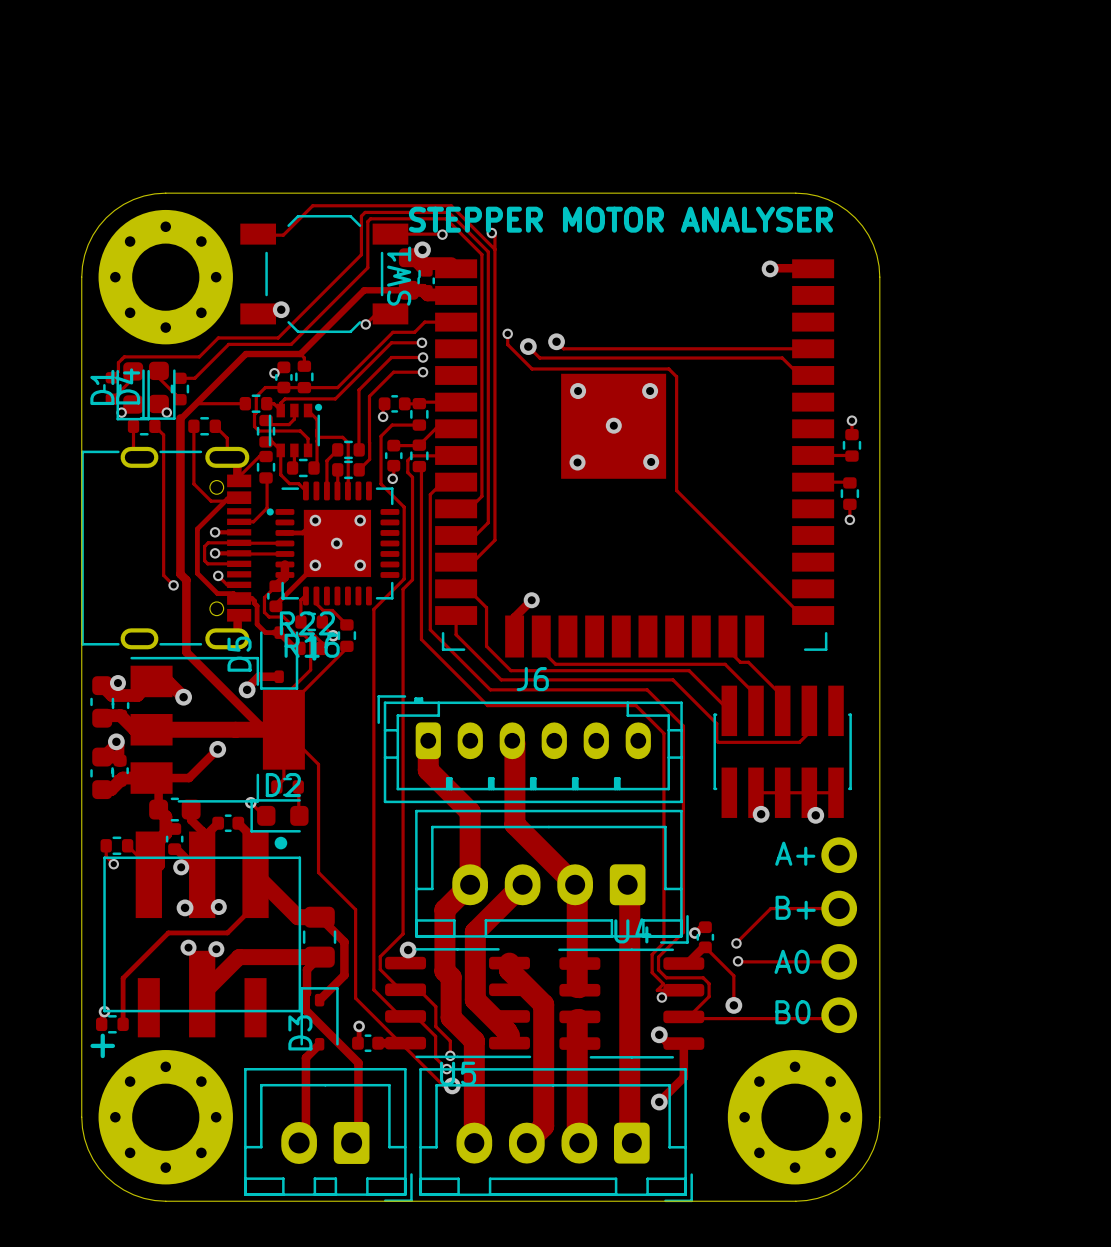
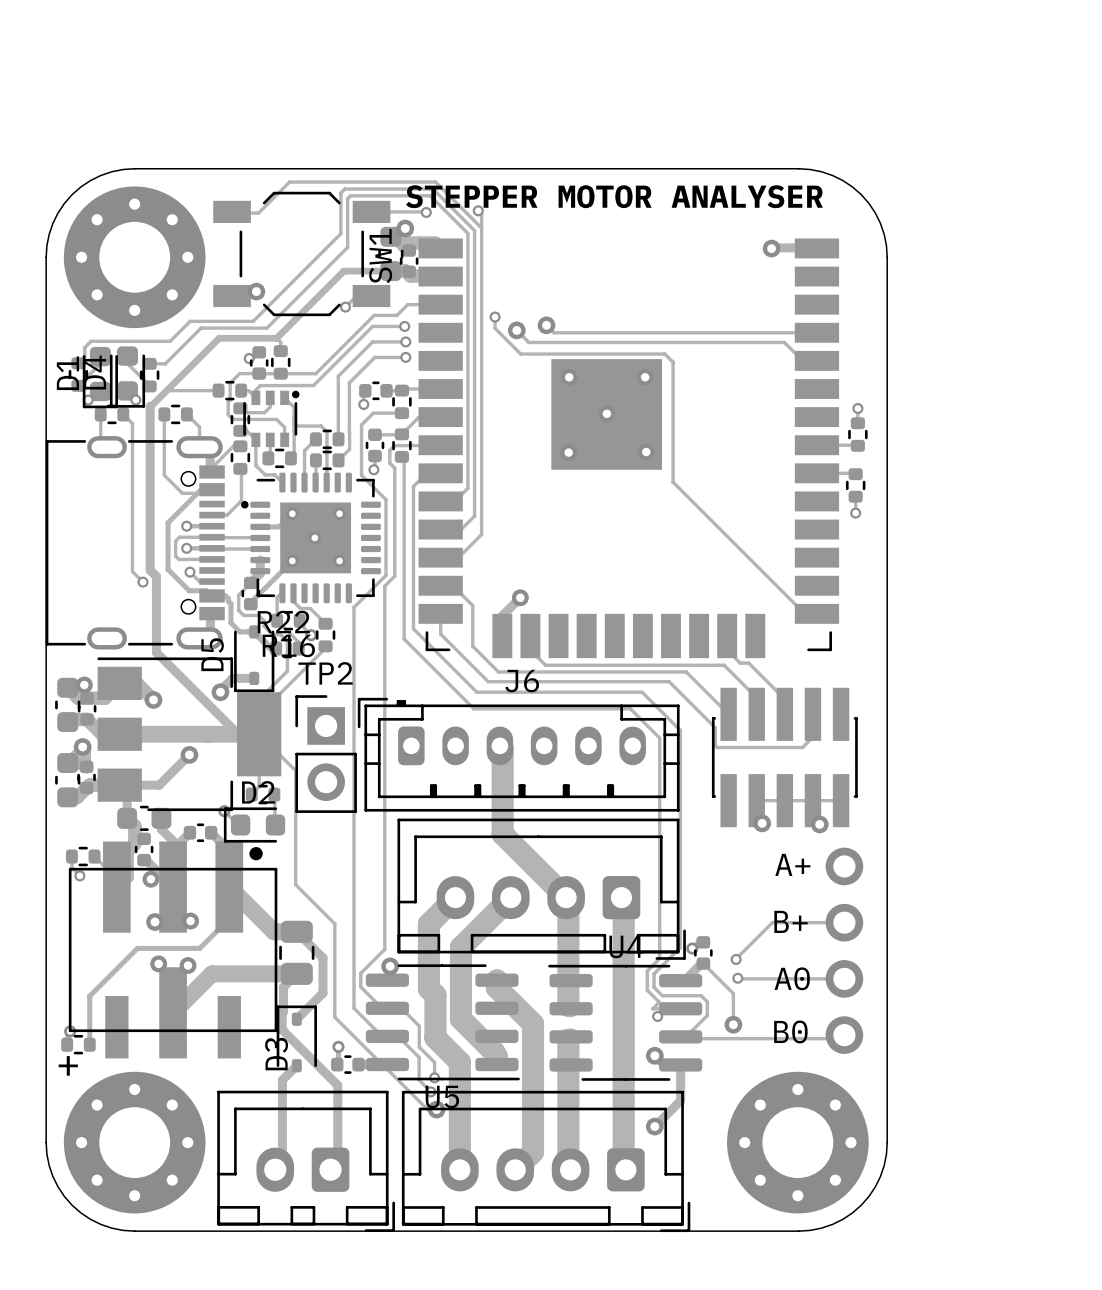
track: (428, 740) (428, 770) (470, 812) (470, 884) -> none
TP2: none -> (326, 754)

